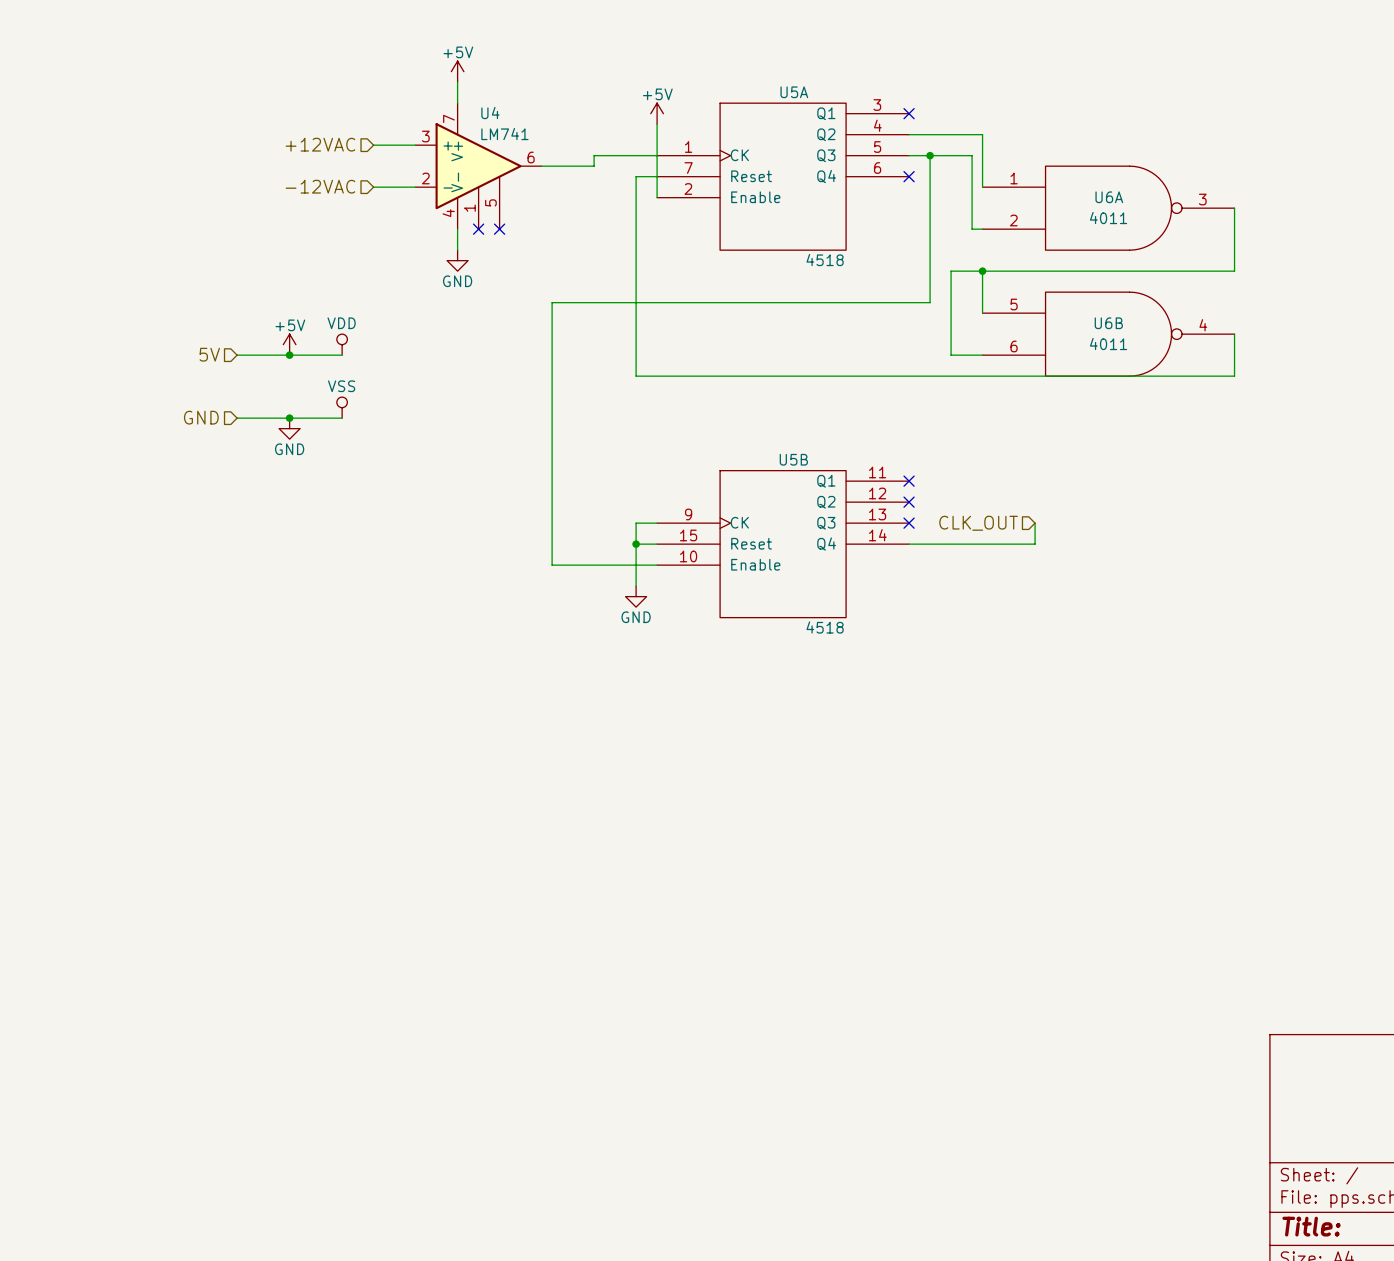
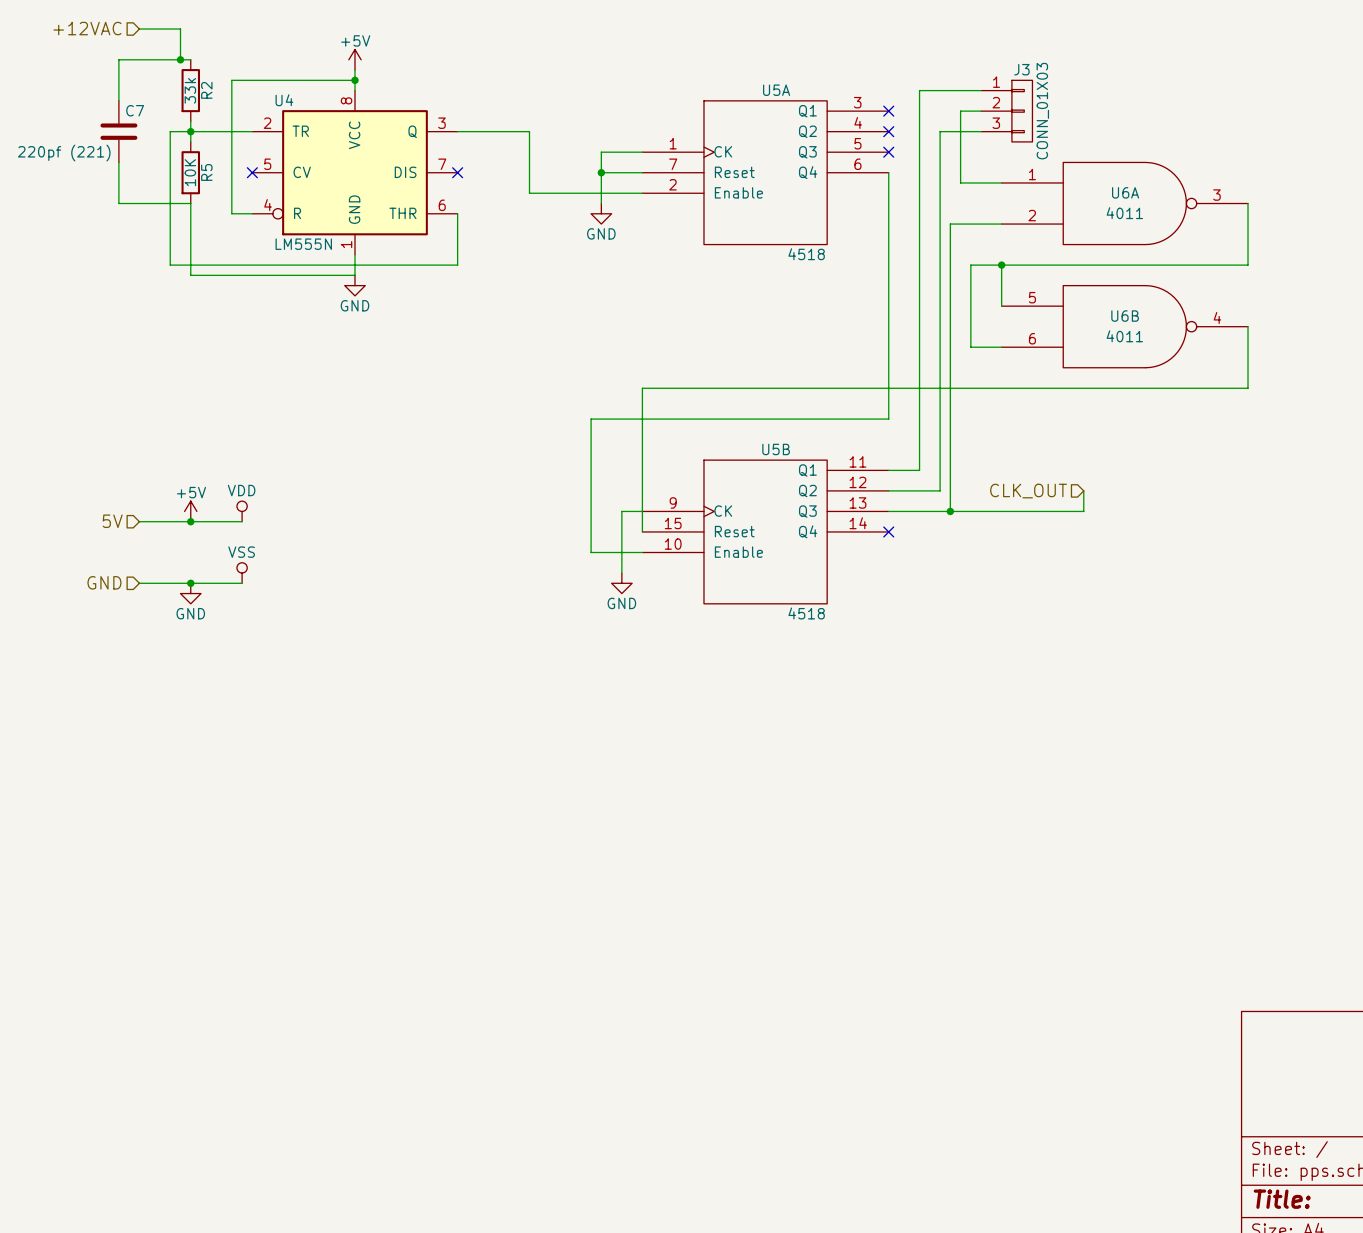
hierarchical label: none -> +12VAC (87, 28)
wire: none -> (139, 29) (180, 29) (180, 59)
junction: none -> (180, 59)
wire: none -> (190, 59) (118, 59) (118, 100)
power symbol position: +5V (457, 71) -> +5V (354, 59)
wire: none -> (354, 80) (231, 80) (231, 213) (252, 213)
junction: none -> (354, 80)
wire: (457, 82) (457, 103) -> (354, 70) (354, 90)
R2: none -> 33k (190, 90)
wire: none -> (981, 90) (919, 90) (919, 470) (888, 470)
U4 symbol: [415, 103, 542, 230] -> [252, 90, 458, 255]
U4 name position: U4 (490, 113) -> U4 (284, 100)
power symbol: +5V (657, 113) -> none
wire: none -> (981, 111) (960, 111) (960, 131) (981, 131)
J3: none -> CONN_01X03 (1006, 111)
wire: none -> (190, 121) (190, 141)
wire: (657, 124) (657, 197) -> (457, 131) (529, 131) (529, 193) (642, 193)
C7: none -> 220pf (221) (118, 131)
junction: none -> (190, 131)
wire: none -> (252, 131) (170, 131) (170, 265) (457, 265) (457, 213)
U4 value: LM741 (504, 134) -> LM555N (303, 244)
wire: (909, 134) (961, 134) -> (888, 490) (940, 490) (940, 131)
no-connect mark: none -> (888, 131)
hierarchical label: +12VAC (320, 144) -> none
wire: (615, 155) (594, 155) (594, 166) (541, 166) -> (601, 152) (601, 203)
wire: (909, 155) (972, 155) (972, 229) -> (950, 511) (950, 224)
no-connect mark: none -> (888, 152)
wire: (930, 155) (930, 302) (552, 302) (552, 565) (604, 565) -> (888, 172) (888, 419) (591, 419) (591, 552)
junction: (930, 155) -> none
wire: none -> (118, 162) (118, 203) (190, 203) (190, 275) (354, 275) (354, 254)
R5: none -> 10K (190, 172)
no-connect mark: none -> (252, 172)
no-connect mark: none -> (457, 172)
junction: none -> (601, 172)
wire: (636, 176) (636, 376) (1234, 376) (1234, 334) -> (621, 172) (601, 172)
no-connect mark: (909, 176) -> none
hierarchical label: -12VAC (320, 186) -> none
U6A position: (1108, 208) -> (1124, 203)
wire: (1234, 208) (1234, 271) -> (1248, 203) (1248, 265) (1206, 265)
power symbol: none -> GND (601, 213)
wire: (457, 229) (457, 250) -> none
no-connect mark: (478, 229) -> none
no-connect mark: (499, 229) -> none
power symbol: GND (457, 260) -> none
wire: (982, 271) (982, 313) -> (1001, 265) (1001, 306)
junction position: (982, 271) -> (1001, 265)
wire: (993, 271) (951, 271) (951, 355) (982, 355) -> (970, 265) (970, 347) (1001, 347)
power symbol: none -> GND (354, 285)
U6B position: (1108, 334) -> (1124, 326)
power symbol: +5V (289, 344) -> none
power symbol position: VDD (342, 344) -> VDD (242, 511)
hierarchical label position: 5V (209, 354) -> 5V (112, 521)
wire: (237, 355) (342, 355) -> (139, 521) (242, 521)
junction: (289, 355) -> none
power symbol position: VSS (342, 407) -> VSS (242, 573)
hierarchical label position: GND (201, 417) -> GND (104, 582)
wire: (237, 418) (342, 418) -> (139, 583) (242, 583)
junction: (289, 418) -> none
power symbol: GND (289, 428) -> none
no-connect mark: (909, 481) -> none
no-connect mark: (909, 502) -> none
wire: none -> (1083, 490) (1083, 511) (888, 511)
power symbol: none -> +5V (190, 511)
no-connect mark: (909, 523) -> none
junction: none -> (950, 511)
hierarchical label position: CLK_OUT (978, 523) -> CLK_OUT (1028, 491)
wire: (1035, 523) (1035, 544) (909, 544) -> none
junction: none -> (190, 521)
wire: (636, 544) (657, 544) -> (1248, 326) (1248, 388) (642, 388) (642, 531)
junction: (636, 544) -> none
no-connect mark: none -> (888, 531)
junction: none -> (190, 583)
power symbol: none -> GND (190, 593)

